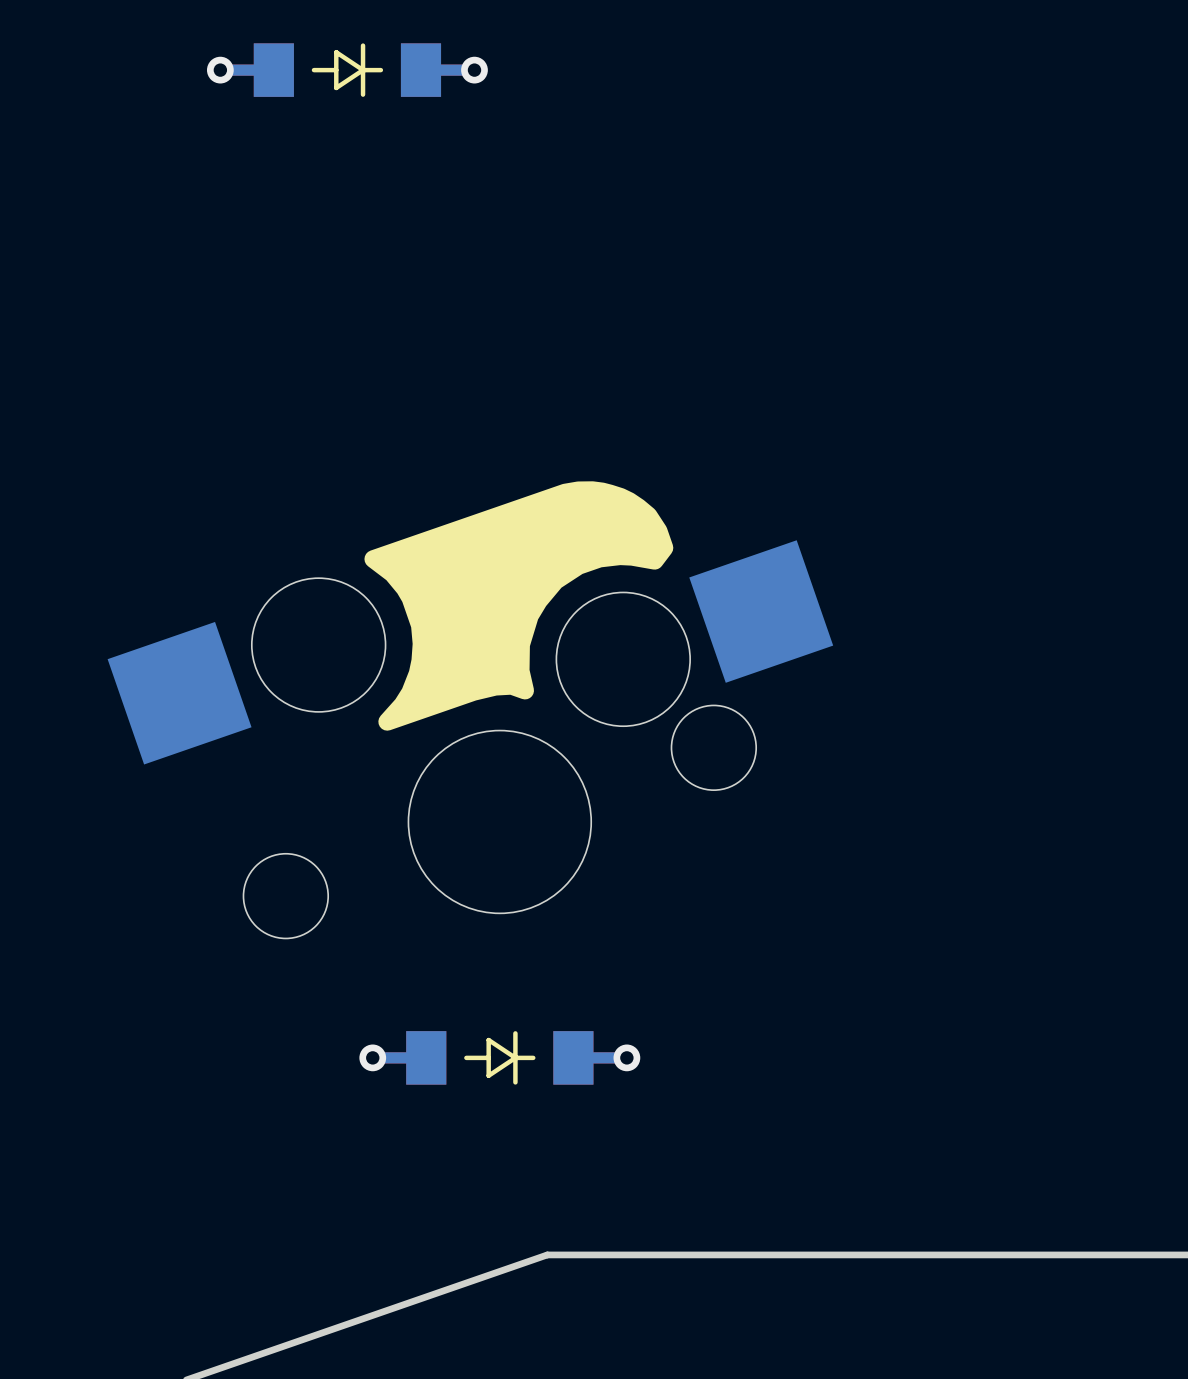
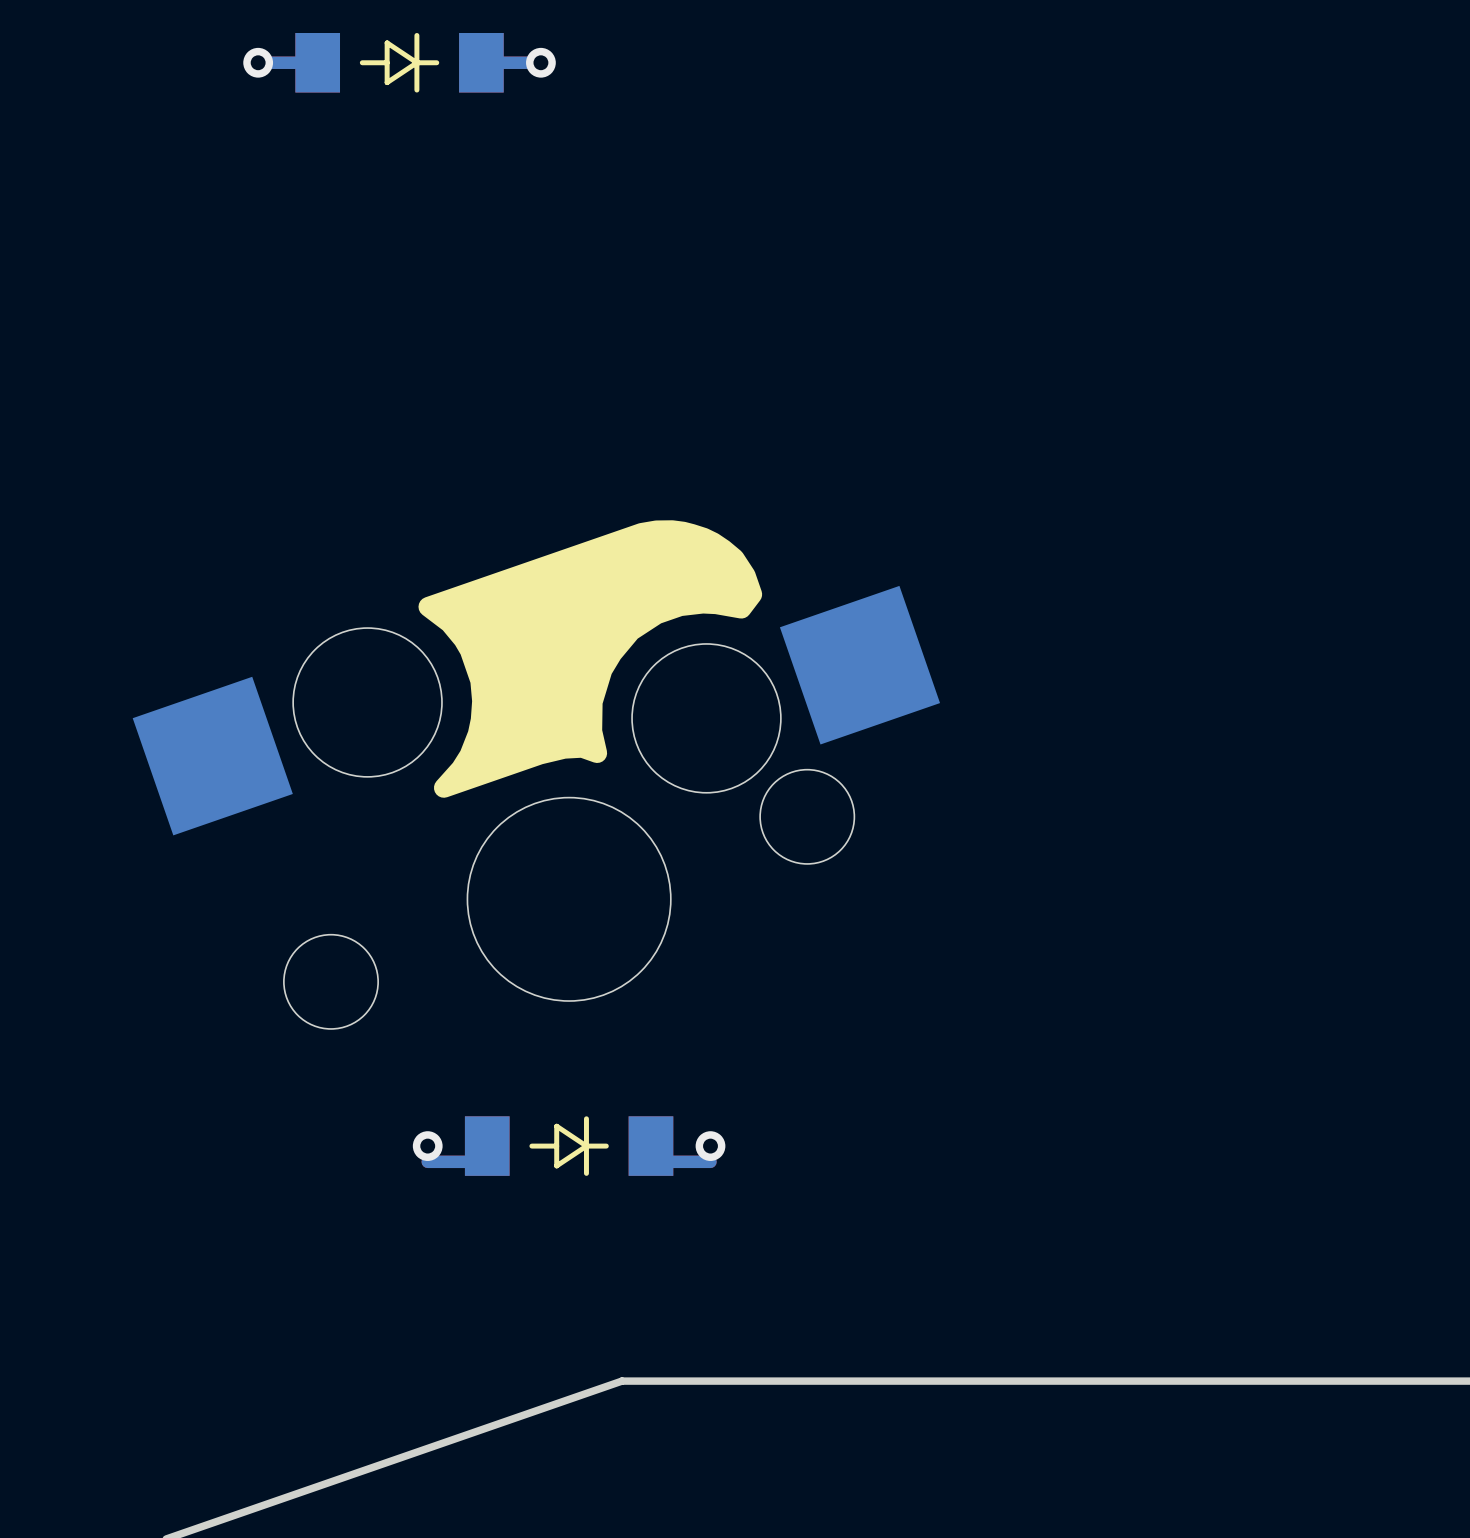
via position: (372, 1057) -> (427, 1146)
part position: (499, 1057) -> (569, 1146)
via position: (626, 1057) -> (710, 1146)

